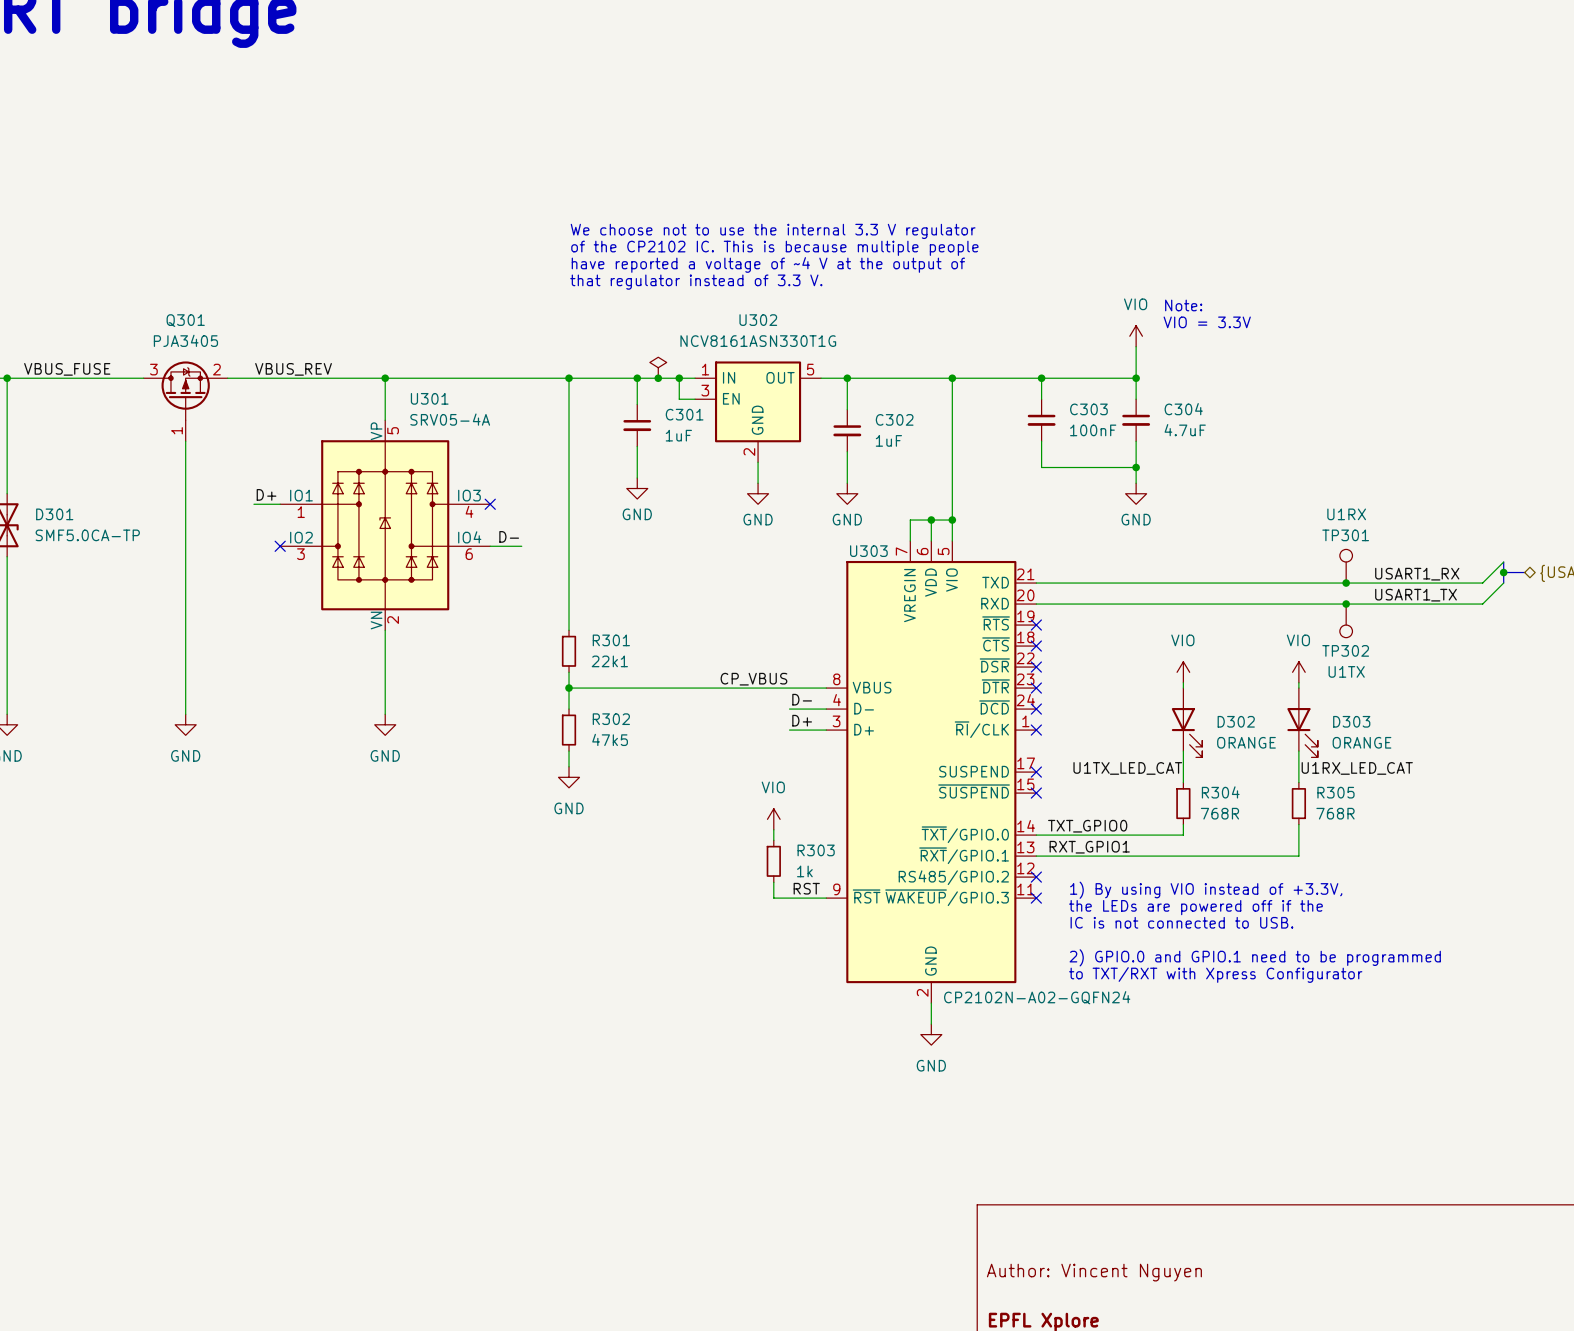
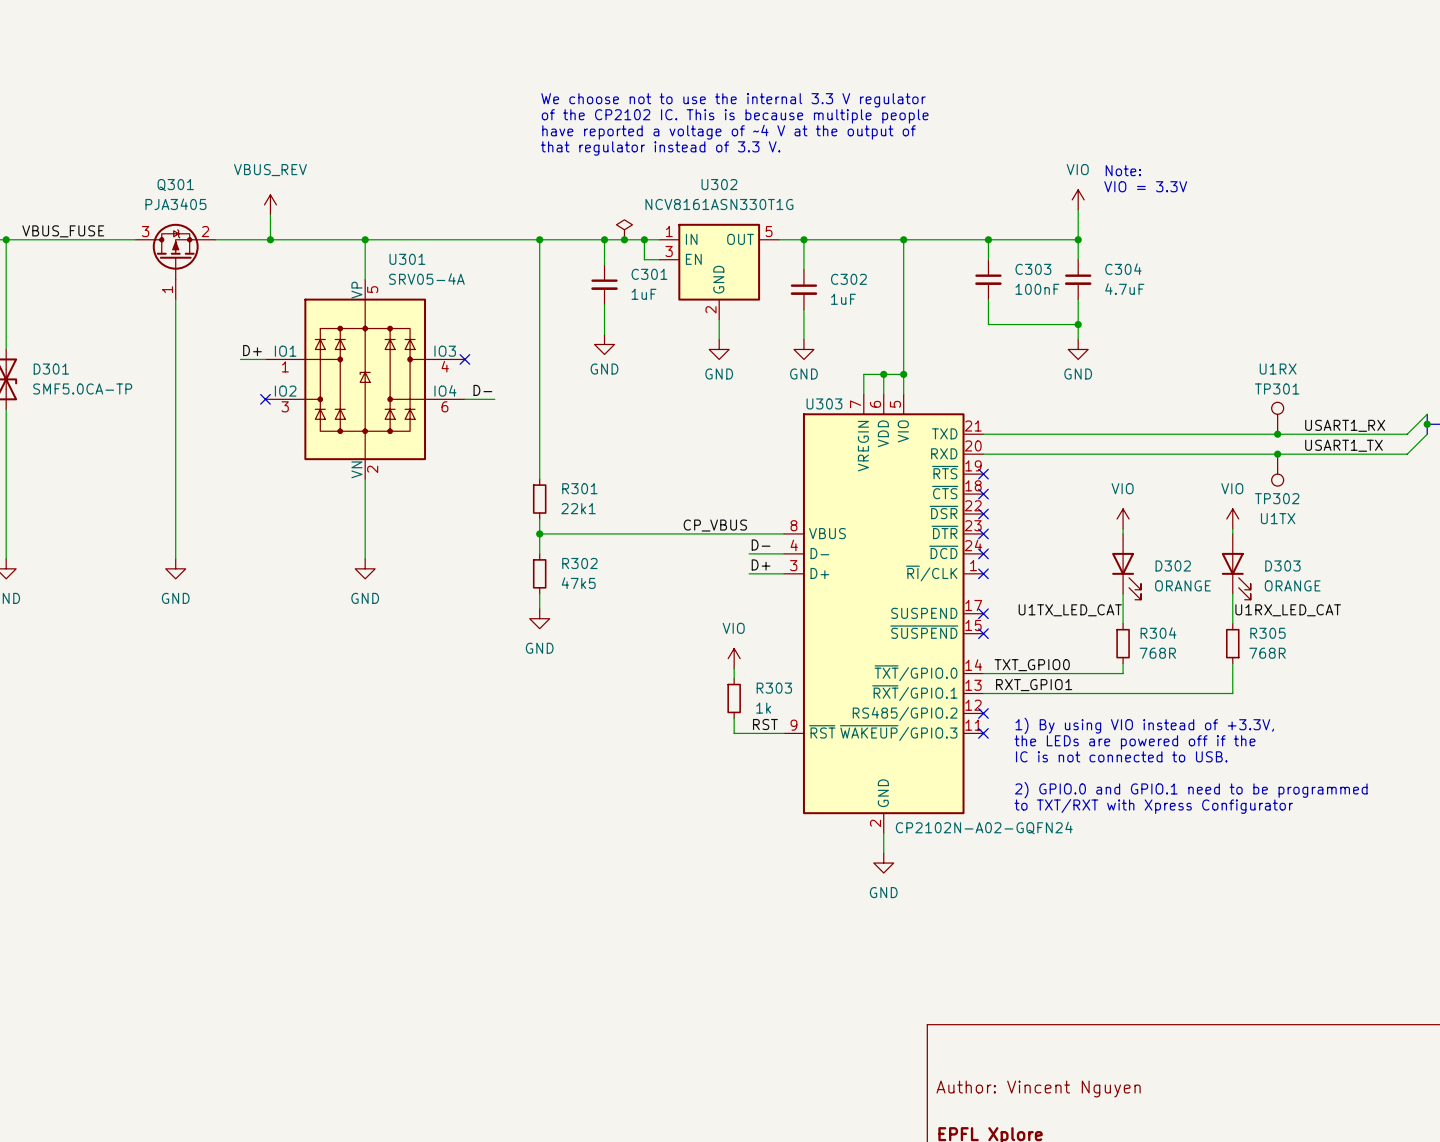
power symbol: none -> VBUS_REV (270, 204)
wire: none -> (270, 214) (270, 239)
label: VBUS_REV (293, 369) -> none
junction: none -> (270, 239)

